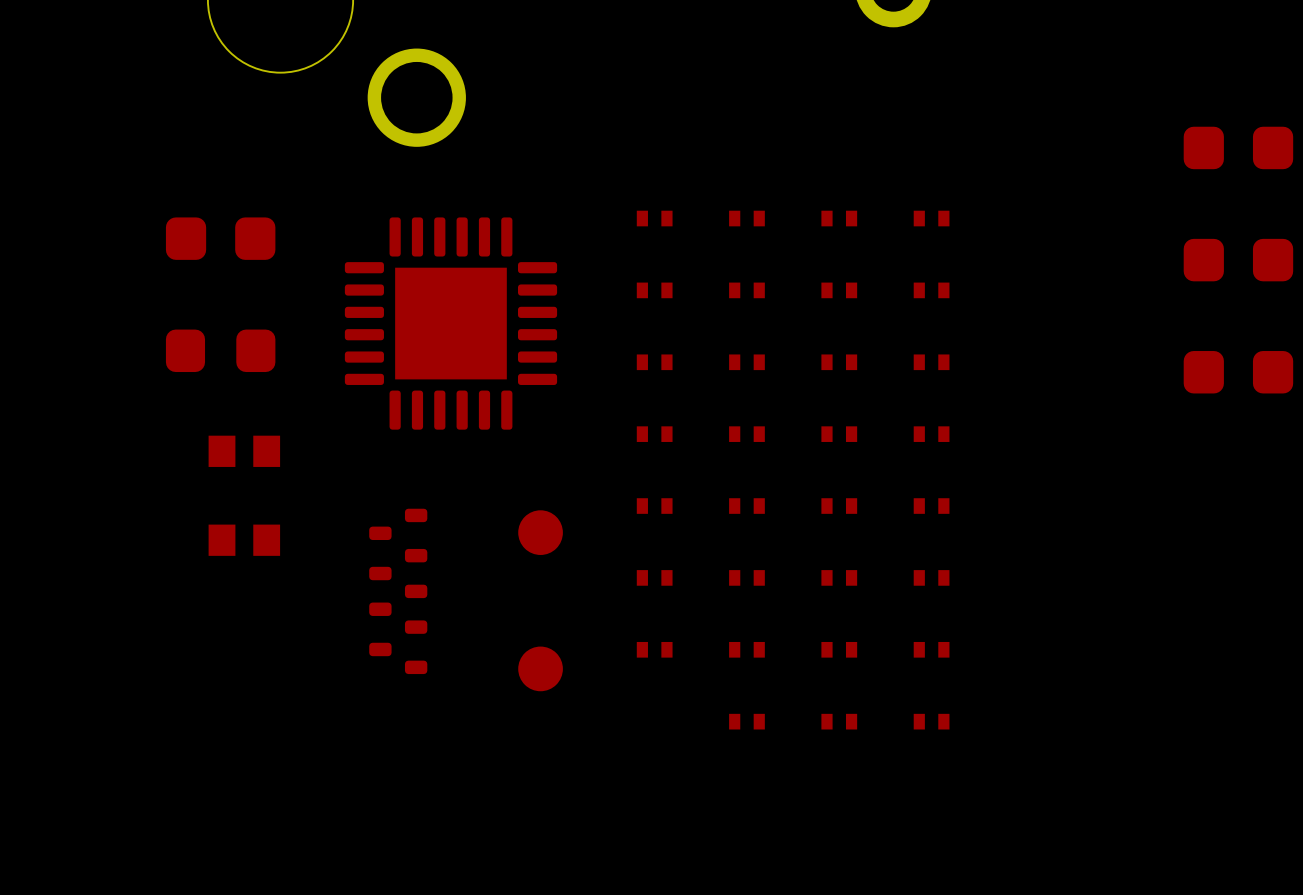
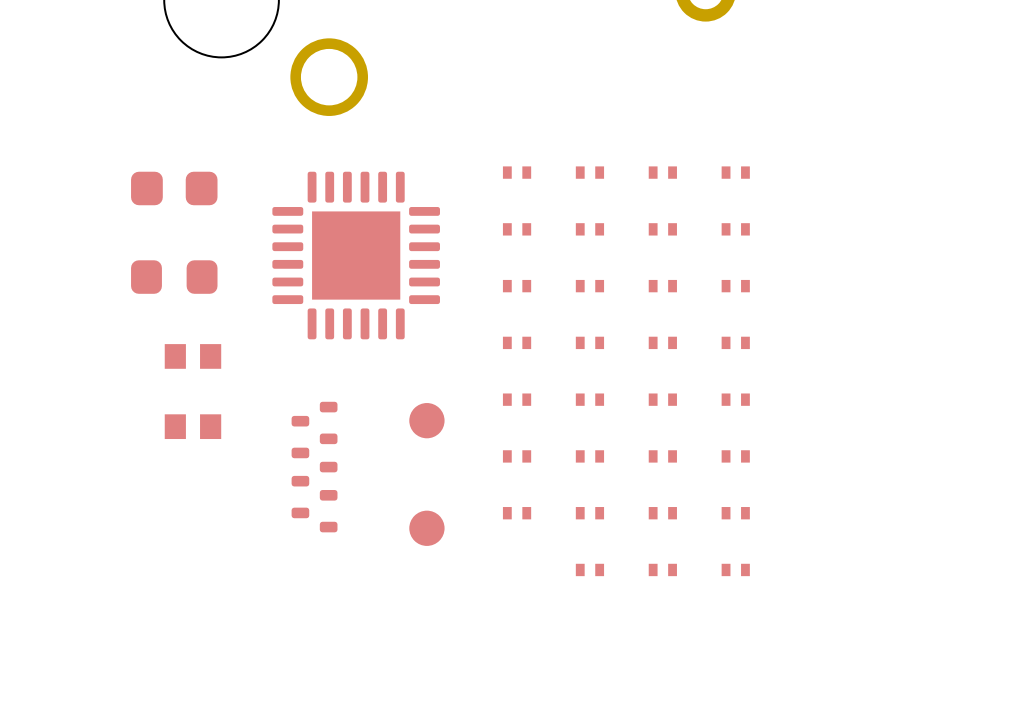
part: (1238, 147) -> none
part: (1238, 260) -> none
part: (1238, 372) -> none

